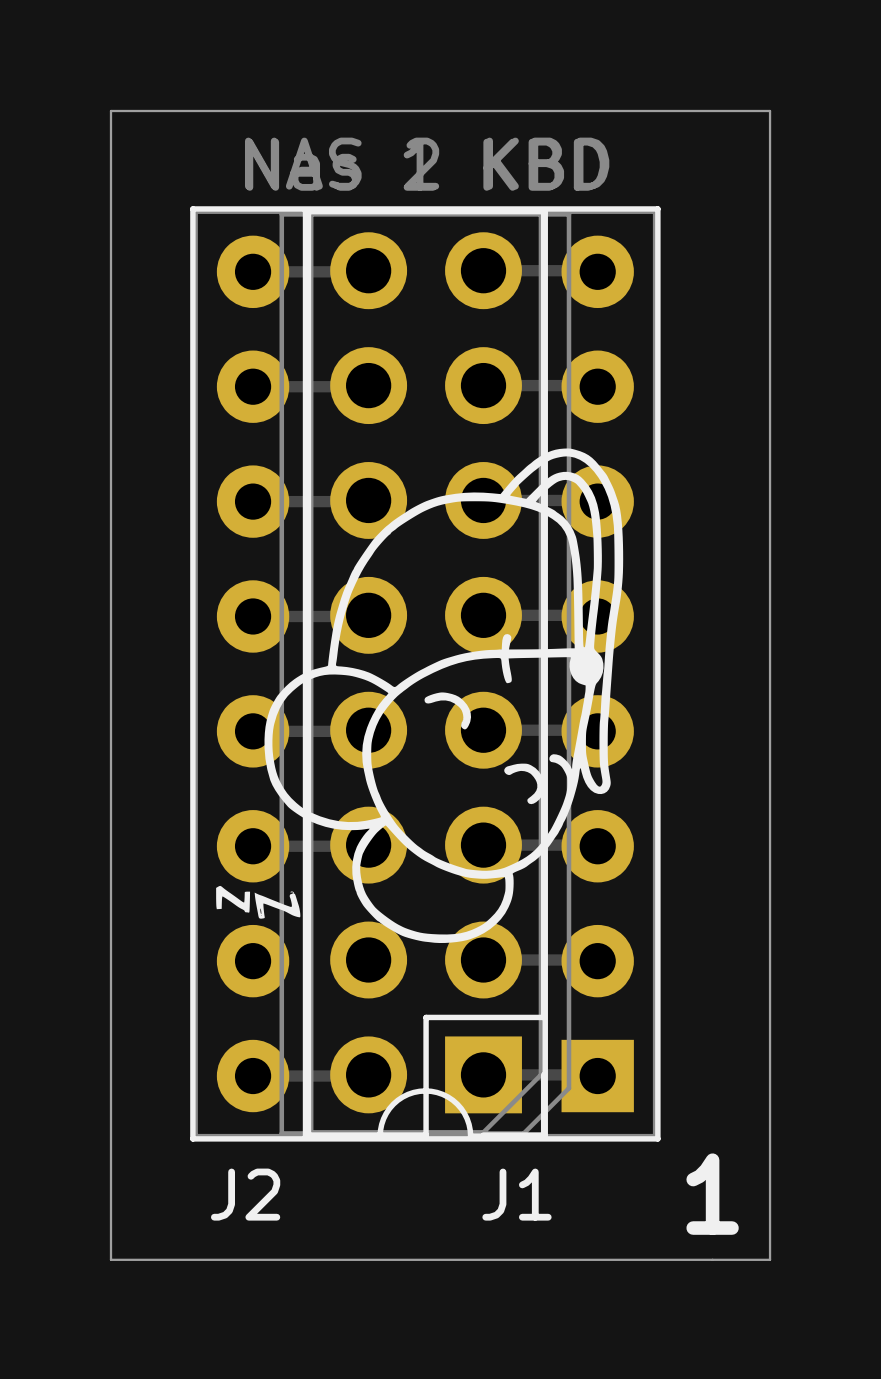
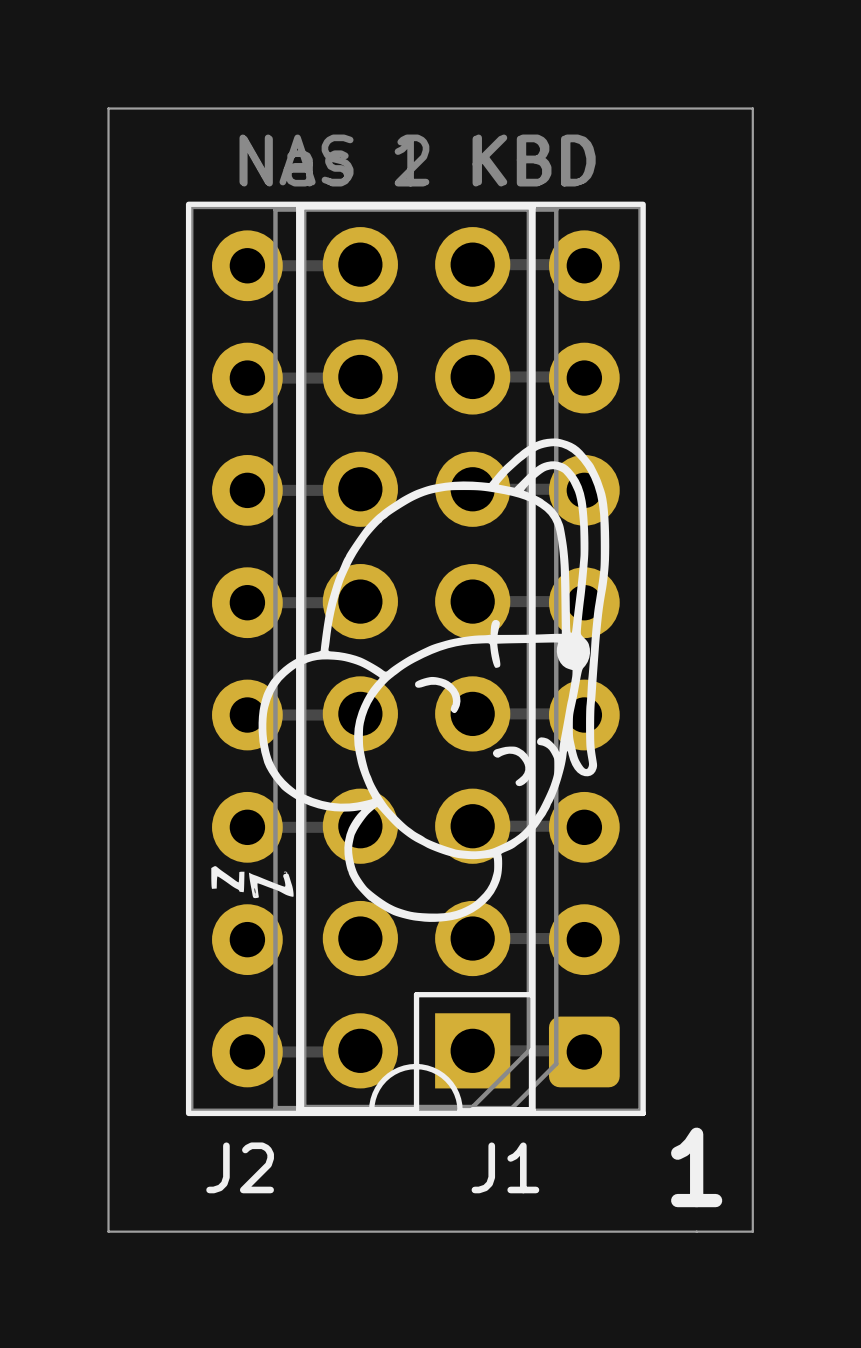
J1 footprint: [190, 206, 661, 1142] -> [185, 201, 646, 1117]

